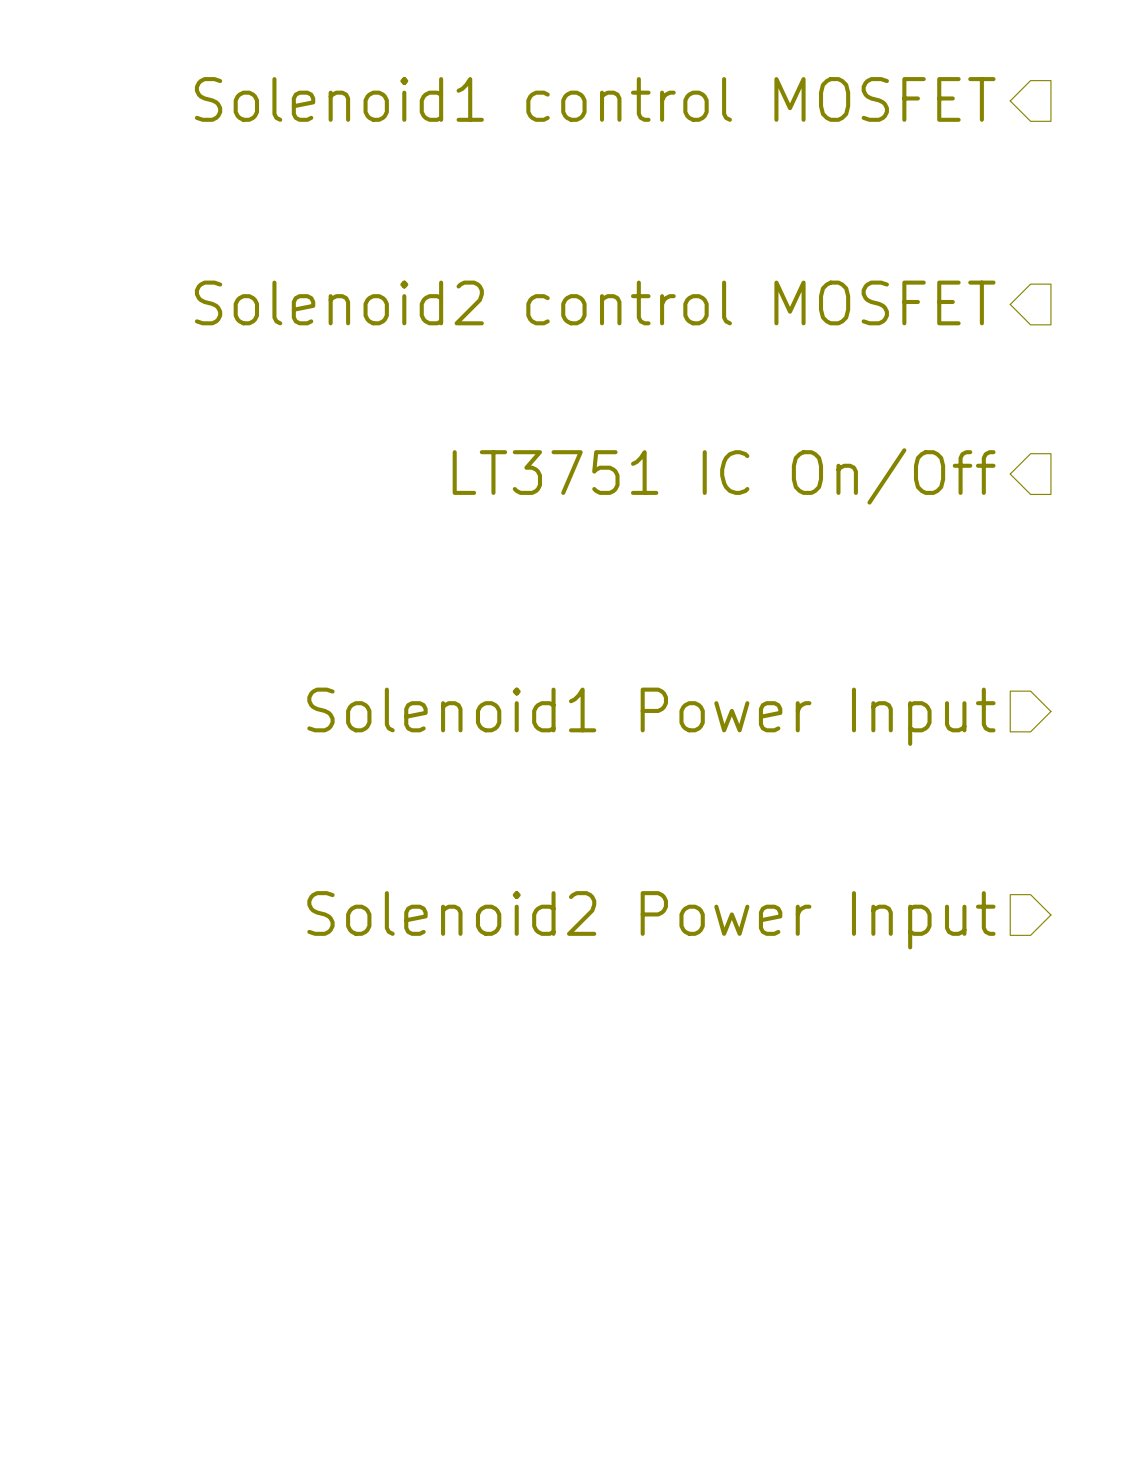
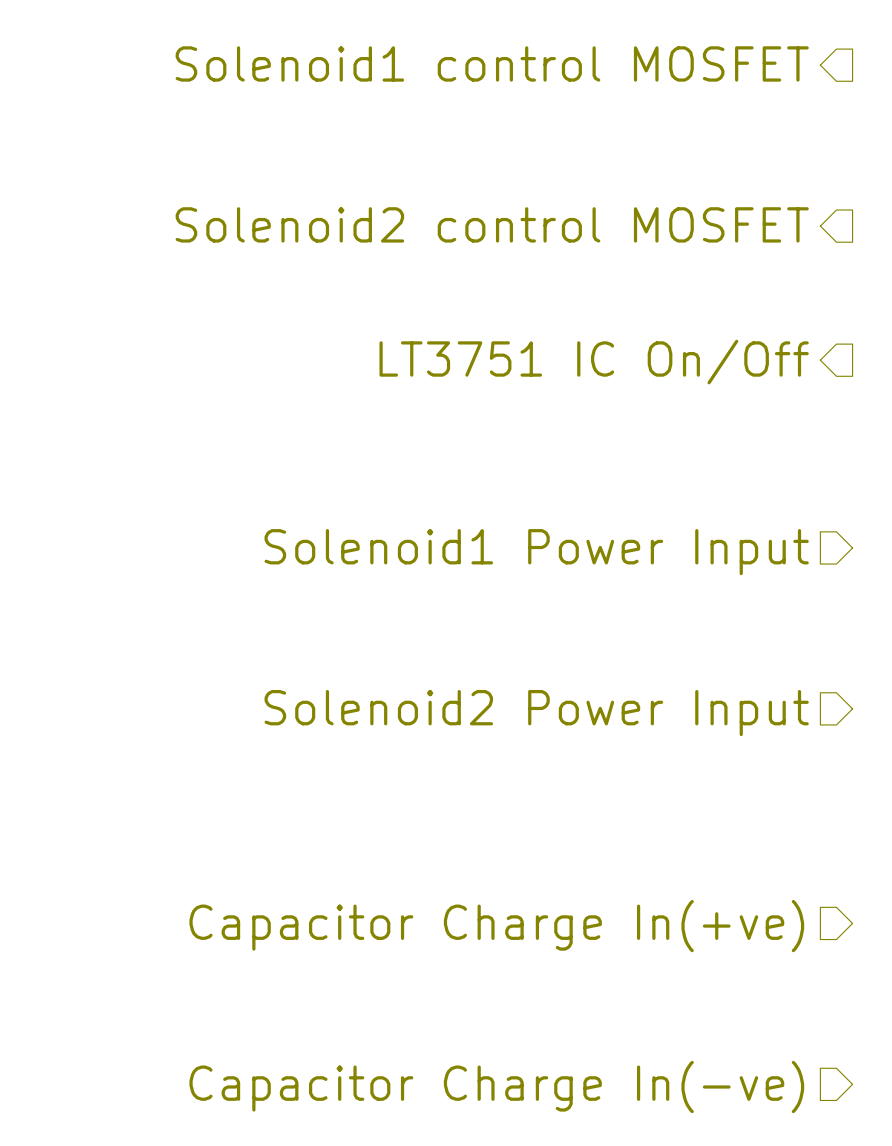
hierarchical label: none -> Capacitor Charge In(+ve) (496, 926)
hierarchical label: none -> Capacitor Charge In(-ve) (496, 1087)

